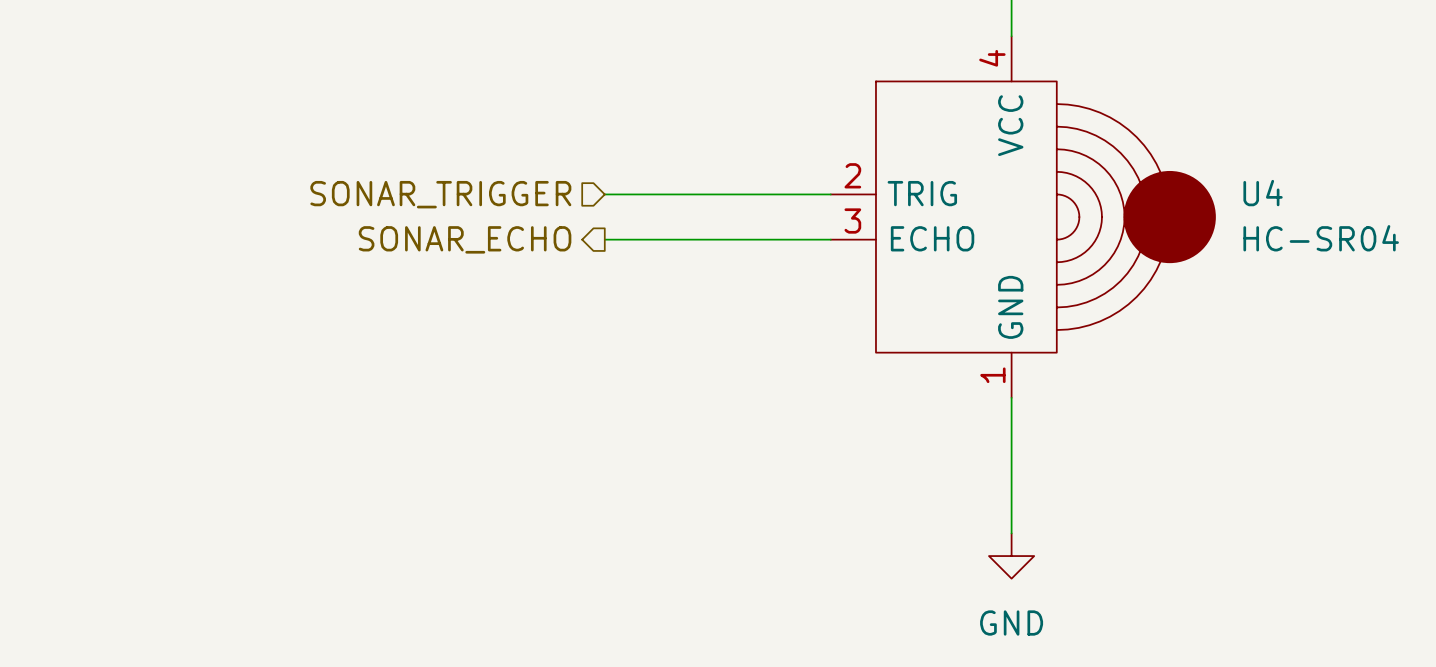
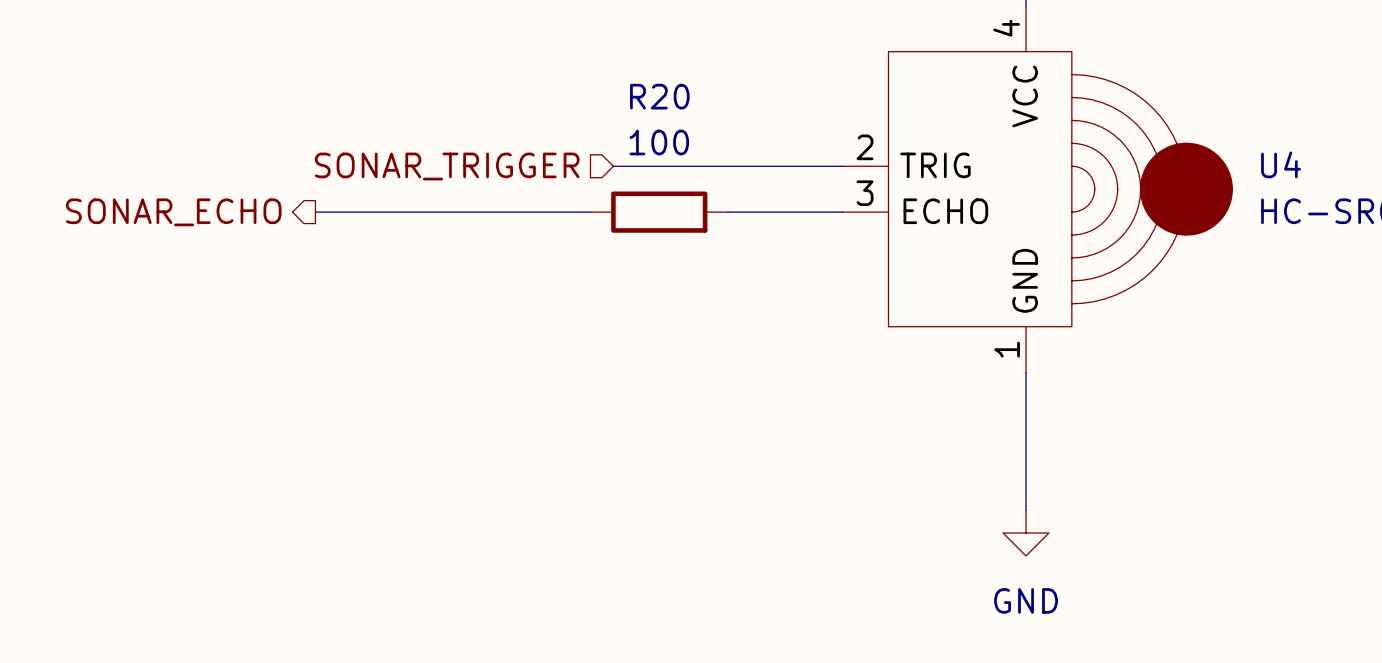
wire: none -> (315, 212) (590, 212)
hierarchical label position: SONAR_ECHO (465, 239) -> SONAR_ECHO (173, 212)
wire: (604, 239) (717, 239) -> none
R20: none -> 100 (659, 212)

